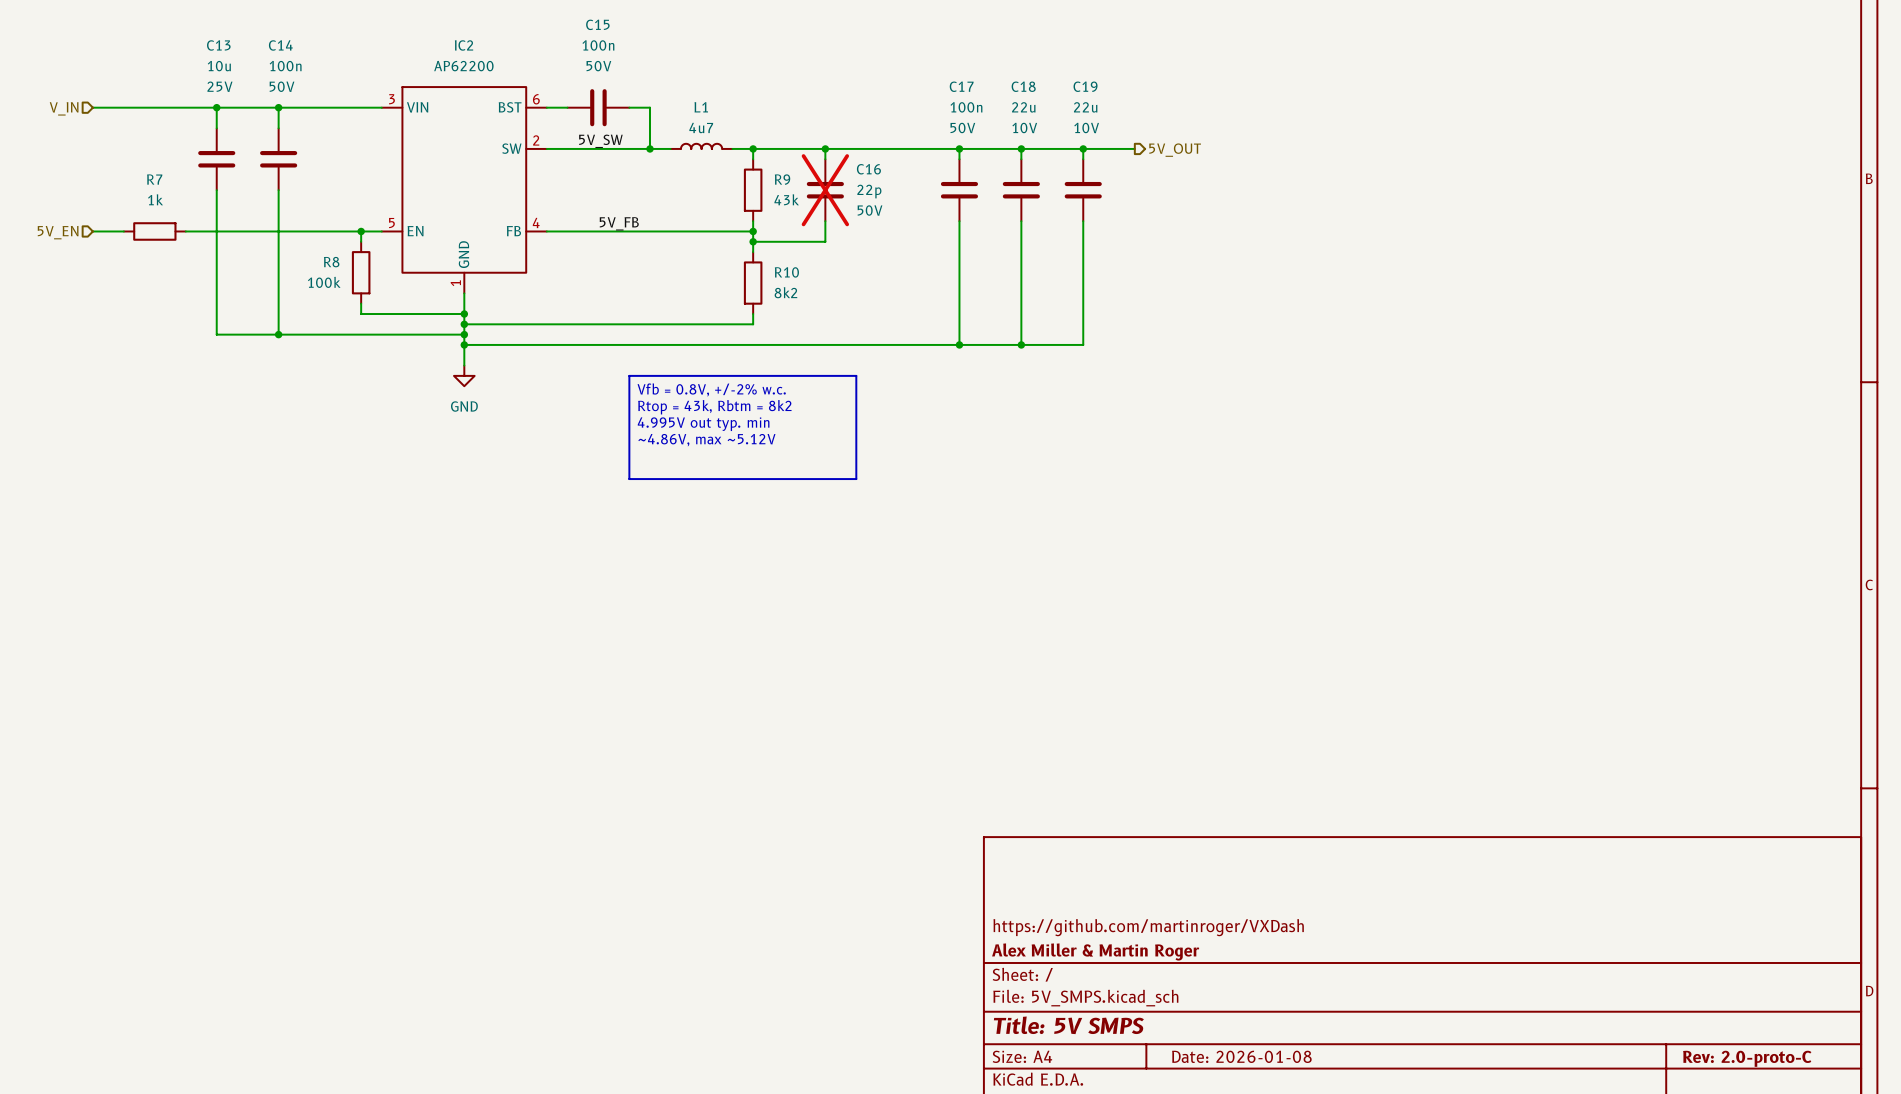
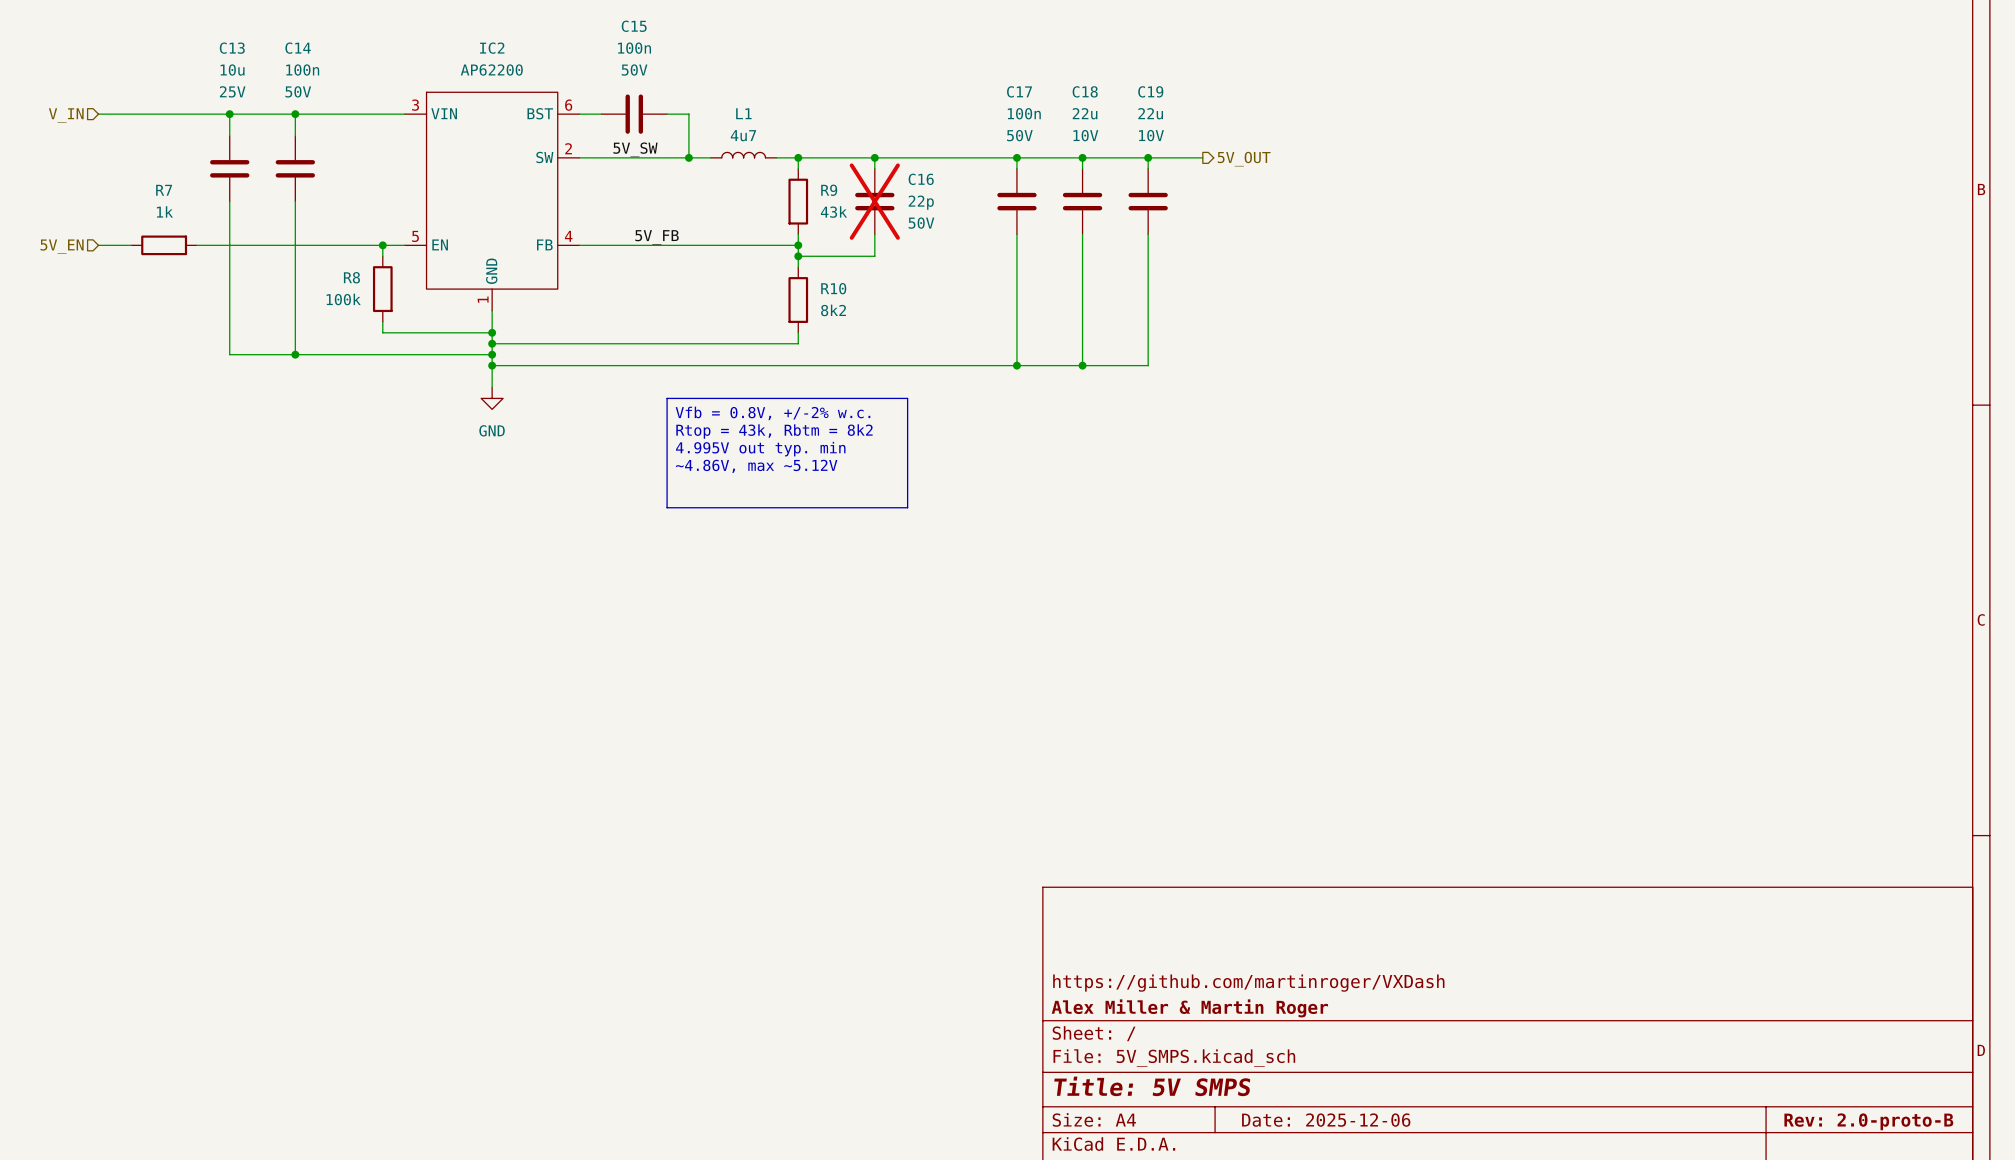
title block: Date: 2026-01-08 (1241, 1056) -> Date: 2025-12-06 (1326, 1120)
title block: Rev: 2.0-proto-C (1747, 1058) -> Rev: 2.0-proto-B (1868, 1121)

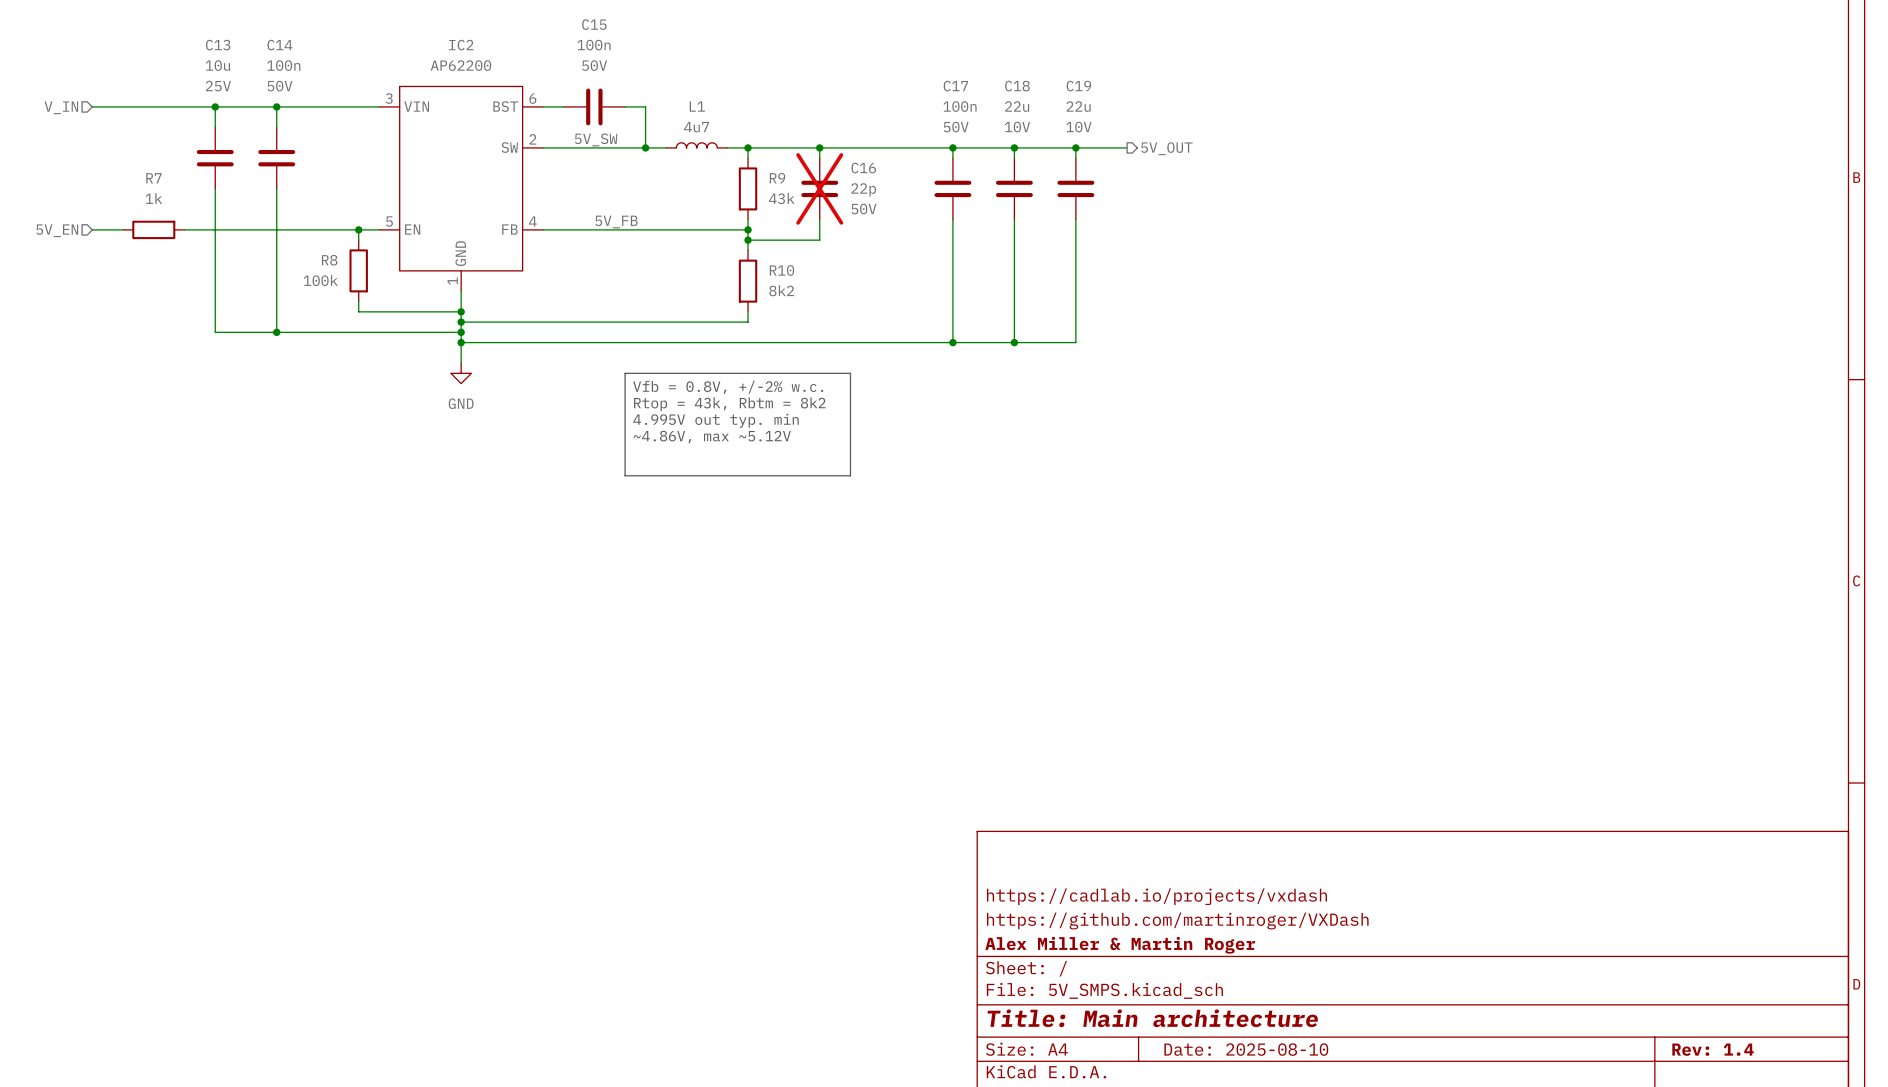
title block: none -> https://cadlab.io/projects/vxdash (1156, 896)
title block: Title: 5V SMPS (1152, 1086) -> Title: Main architecture (1152, 1018)
title block: Date: 2025-12-06 (1326, 1120) -> Date: 2025-08-10 (1246, 1049)
title block: Rev: 2.0-proto-B (1868, 1121) -> Rev: 1.4 (1713, 1049)

